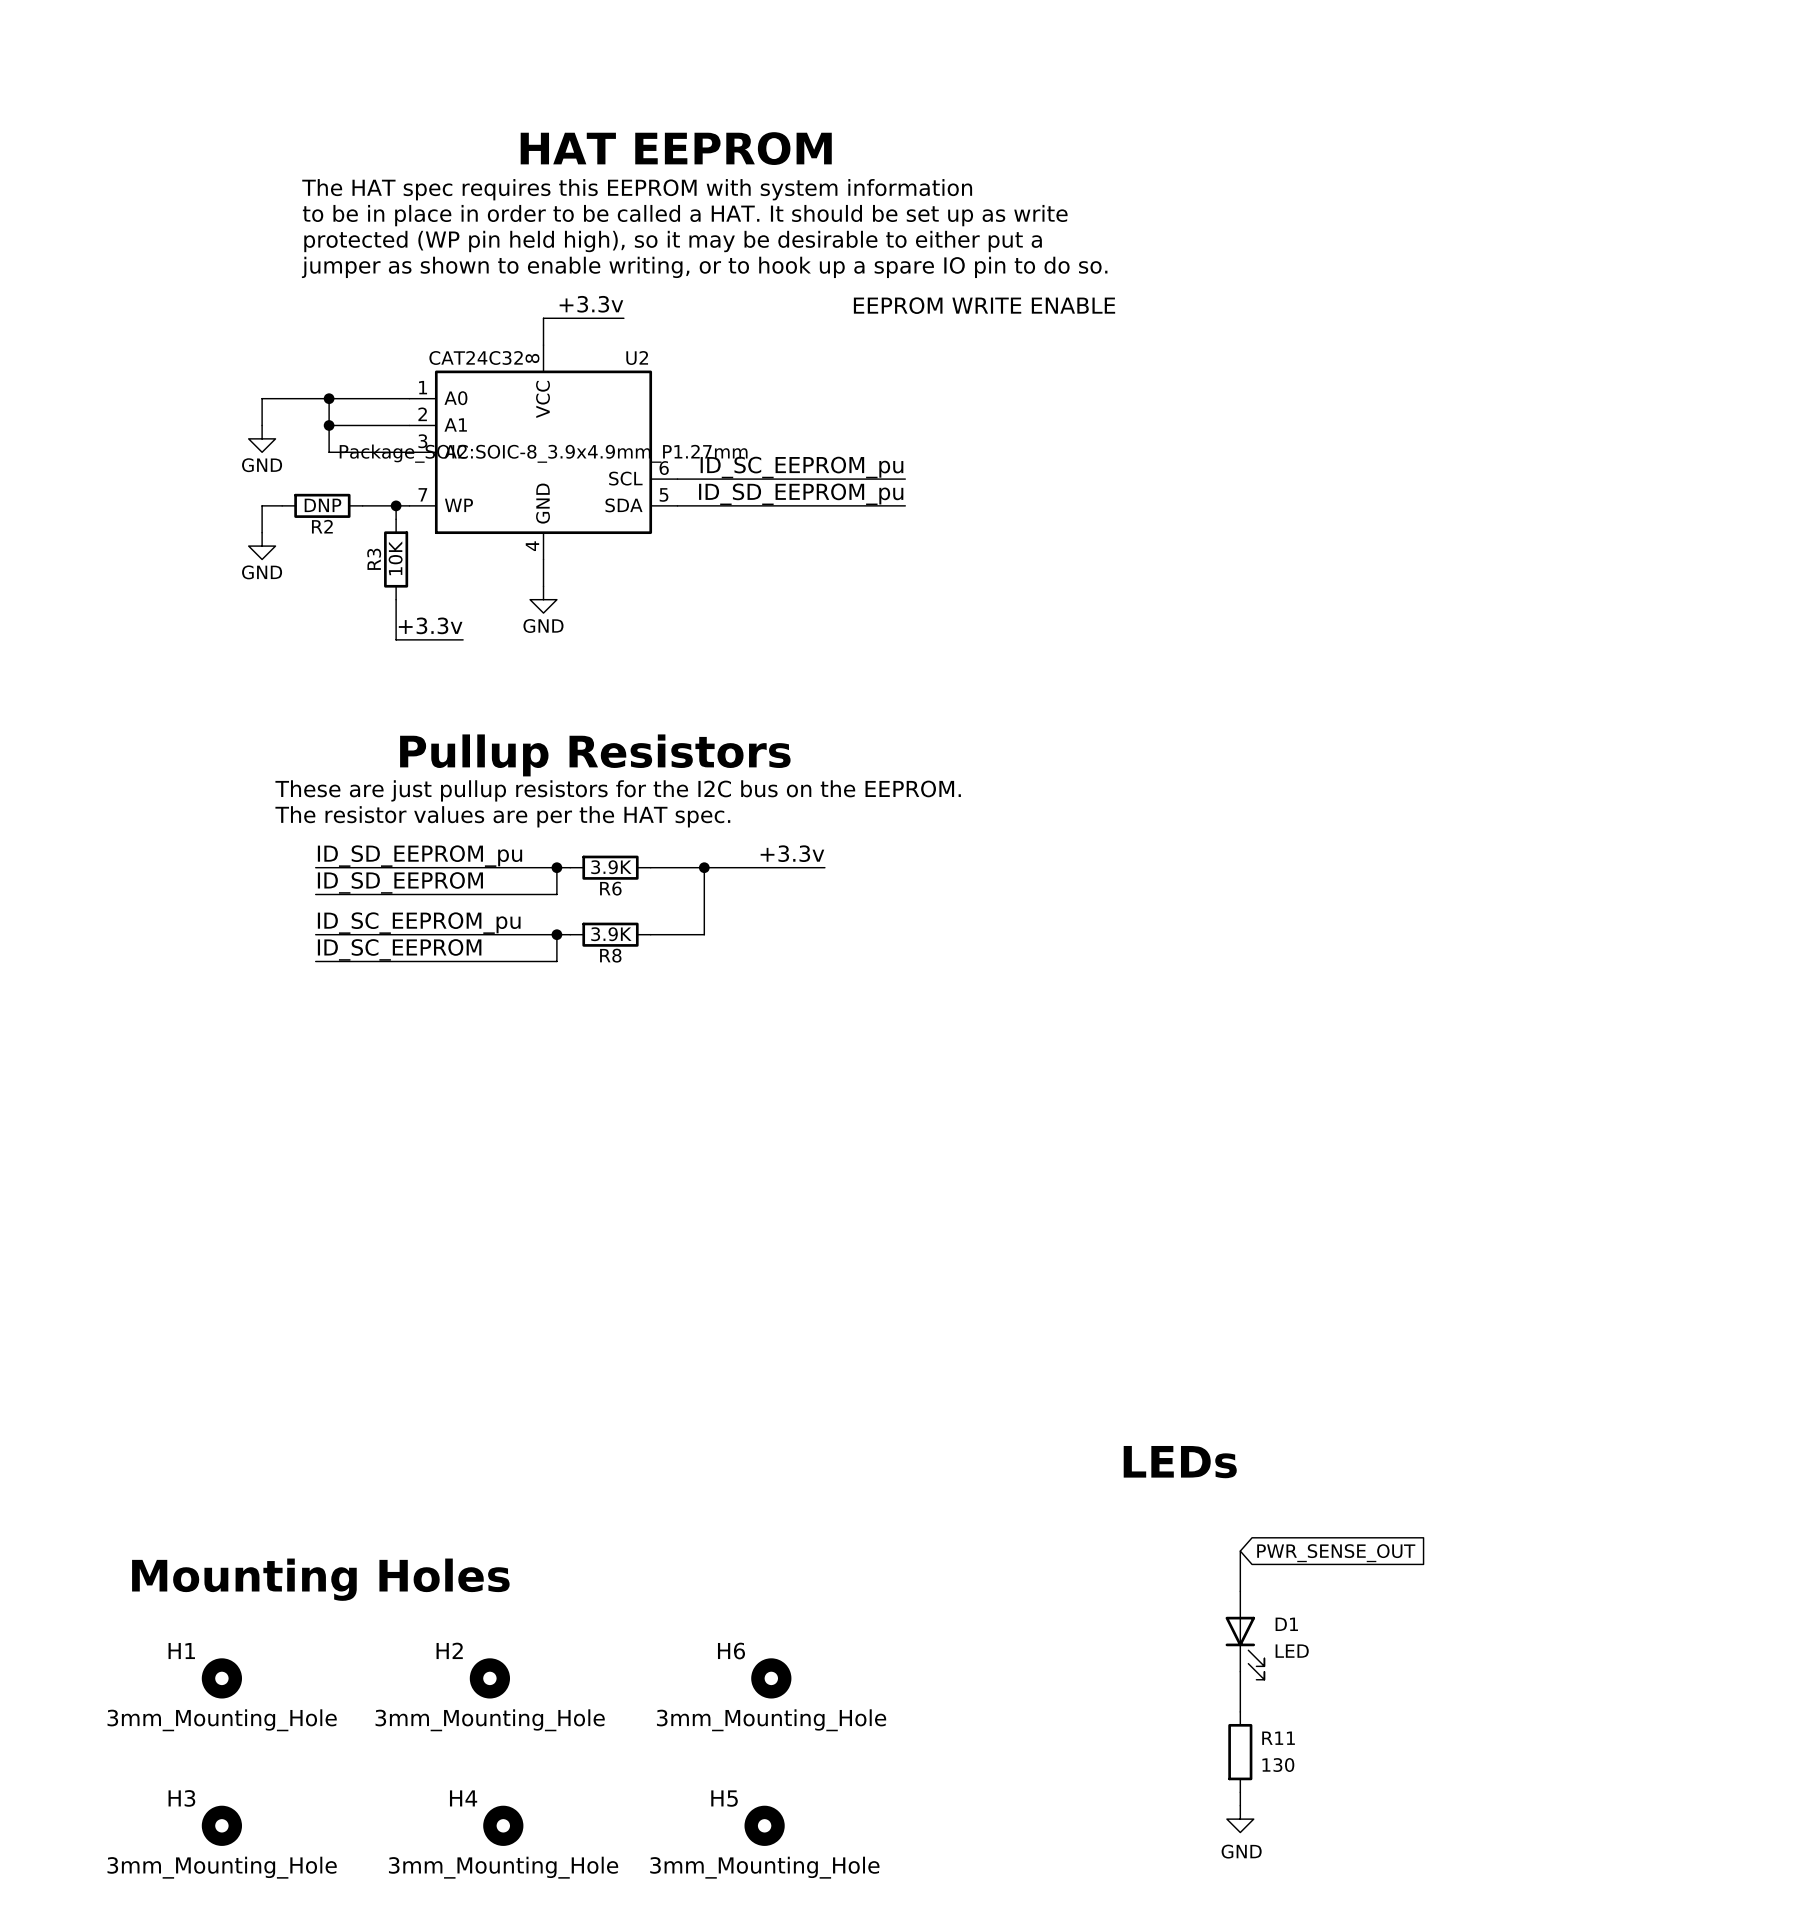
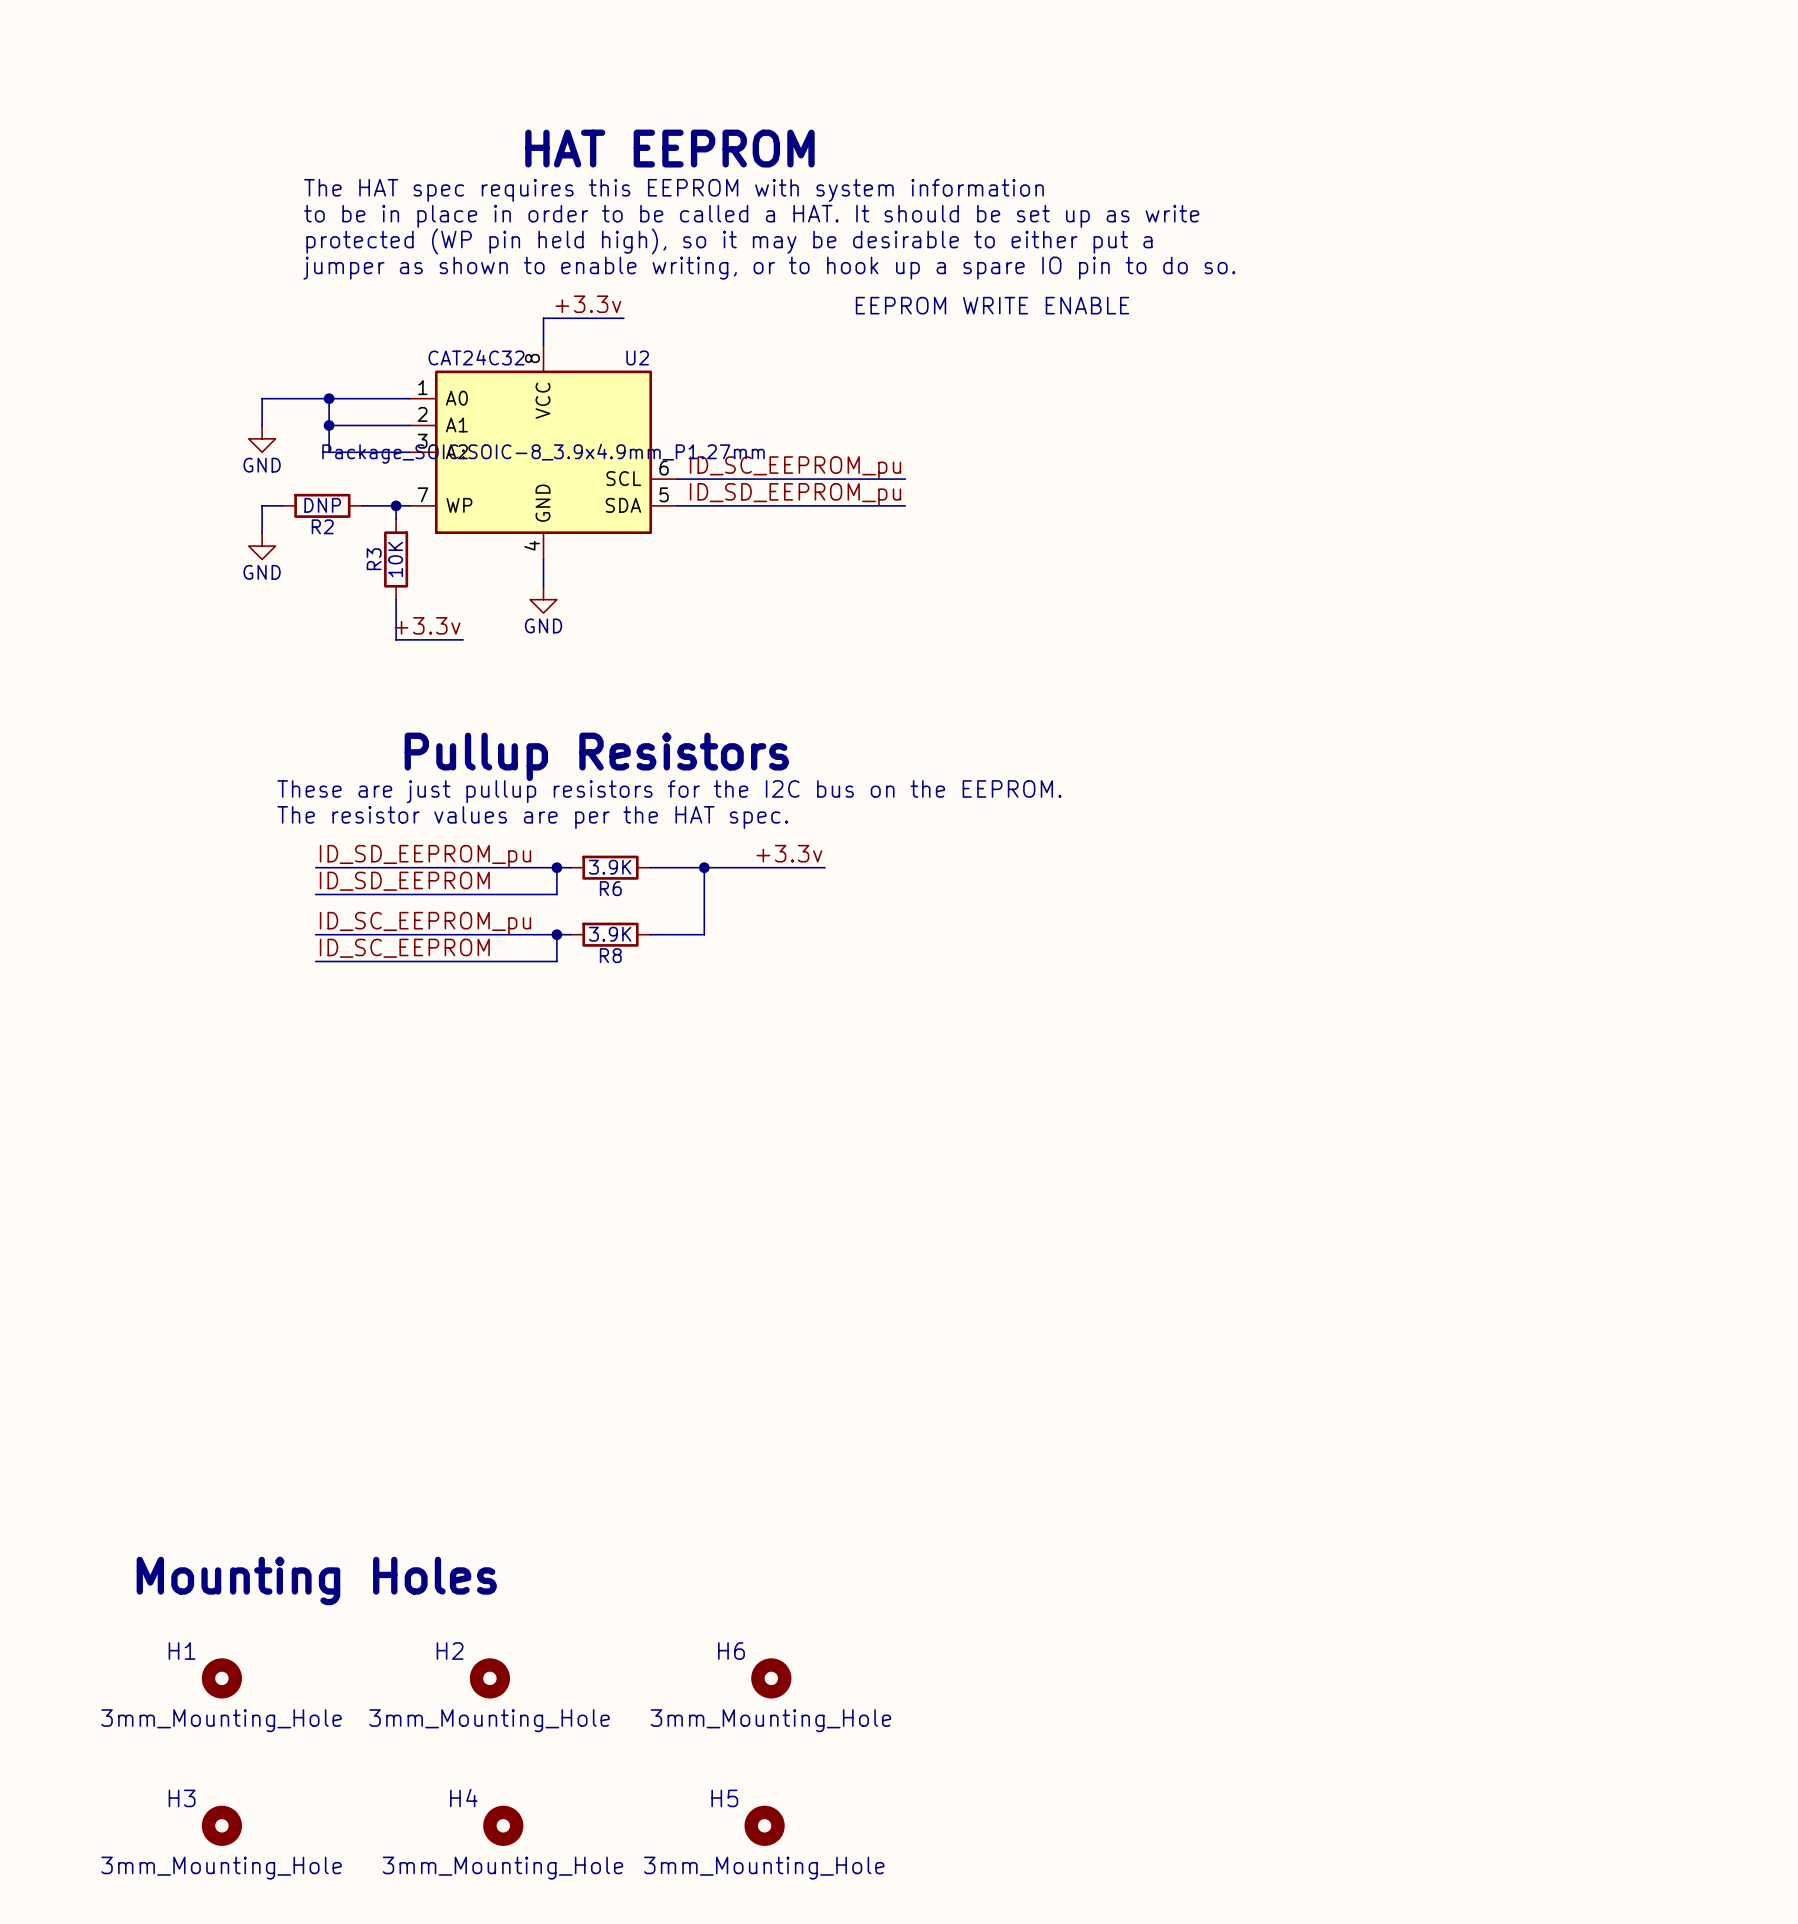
text: LEDs (1180, 1462) -> none
wire: (1240, 1551) (1240, 1591) -> none
global label: PWR_SENSE_OUT (1336, 1553) -> none
D1: LED (1245, 1635) -> none
wire: (1240, 1671) (1240, 1711) -> none
R11: 130 (1240, 1752) -> none
wire: (1240, 1792) (1240, 1805) -> none
power symbol: GND (1240, 1819) -> none

